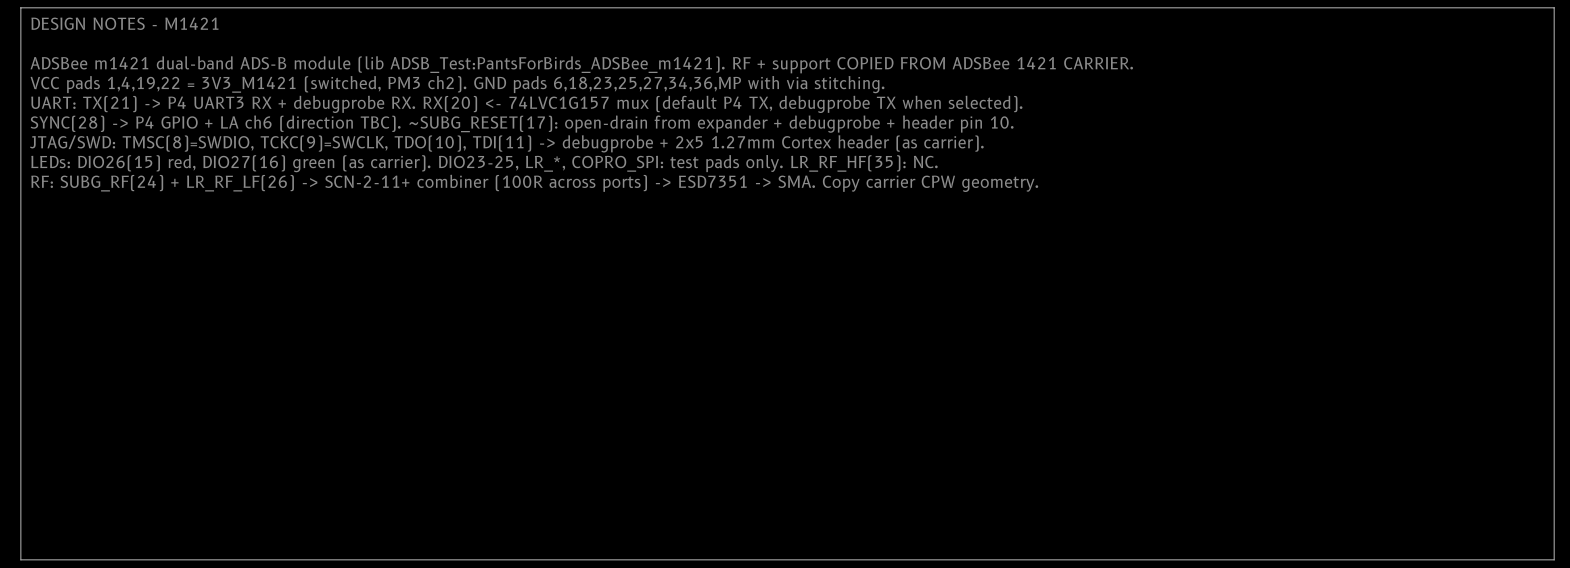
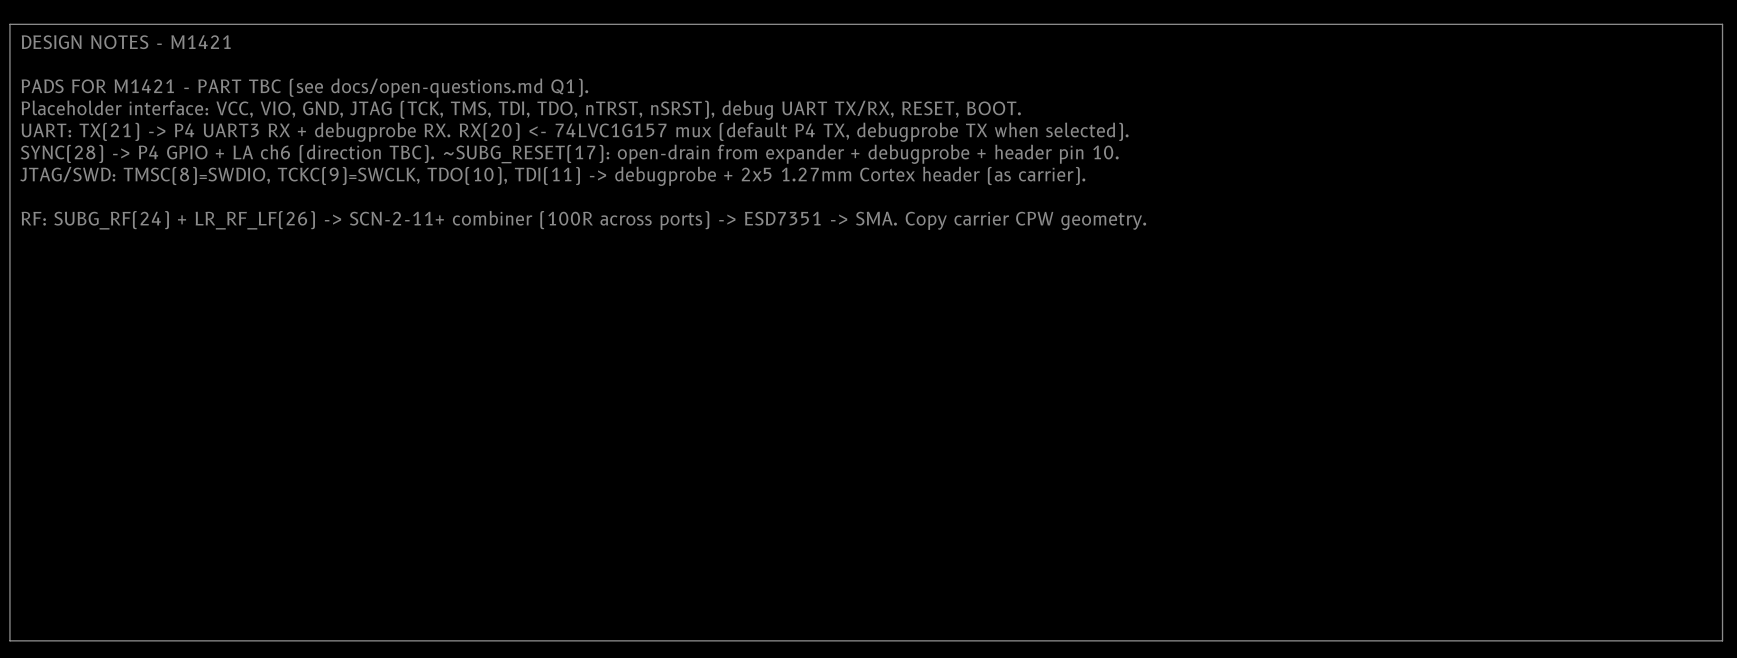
text: ADSBee m1421 dual-band ADS-B module (lib ADSB_Test:PantsForBirds_ADSBee_m1421). RF + support COPIED FROM ADSBee 1421 CARRIER. (581, 64) -> PADS FOR M1421 - PART TBC (see docs/open-questions.md Q1). (304, 88)
text: VCC pads 1,4,19,22 = 3V3_M1421 (switched, PM3 ch2). GND pads 6,18,23,25,27,34,36,MP with via stitching. (457, 84) -> Placeholder interface: VCC, VIO, GND, JTAG (TCK, TMS, TDI, TDO, nTRST, nSRST), debug UART TX/RX, RESET, BOOT. (521, 110)
text: LEDs: DIO26(15) red, DIO27(16) green (as carrier). DIO23-25, LR_*, COPRO_SPI: test pads only. LR_RF_HF(35): NC. (484, 163) -> none

